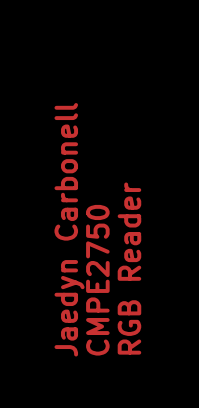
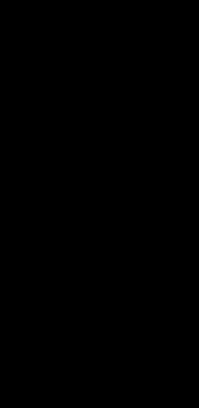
text: Jaedyn Carbonell (69, 229) -> none
text: RGB Reader (129, 268) -> none
text: CMPE2750 (97, 280) -> none

